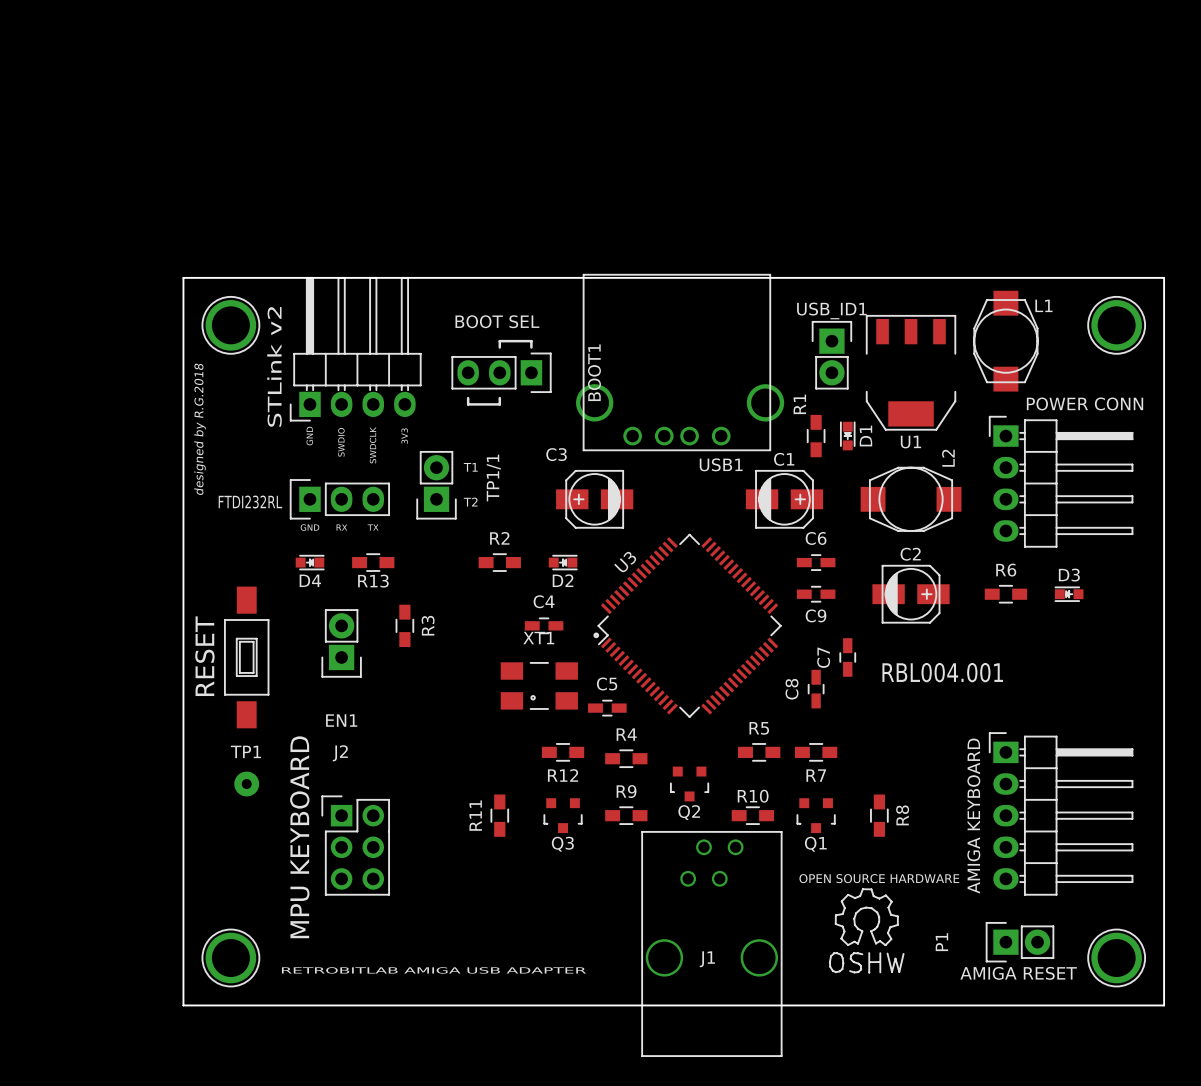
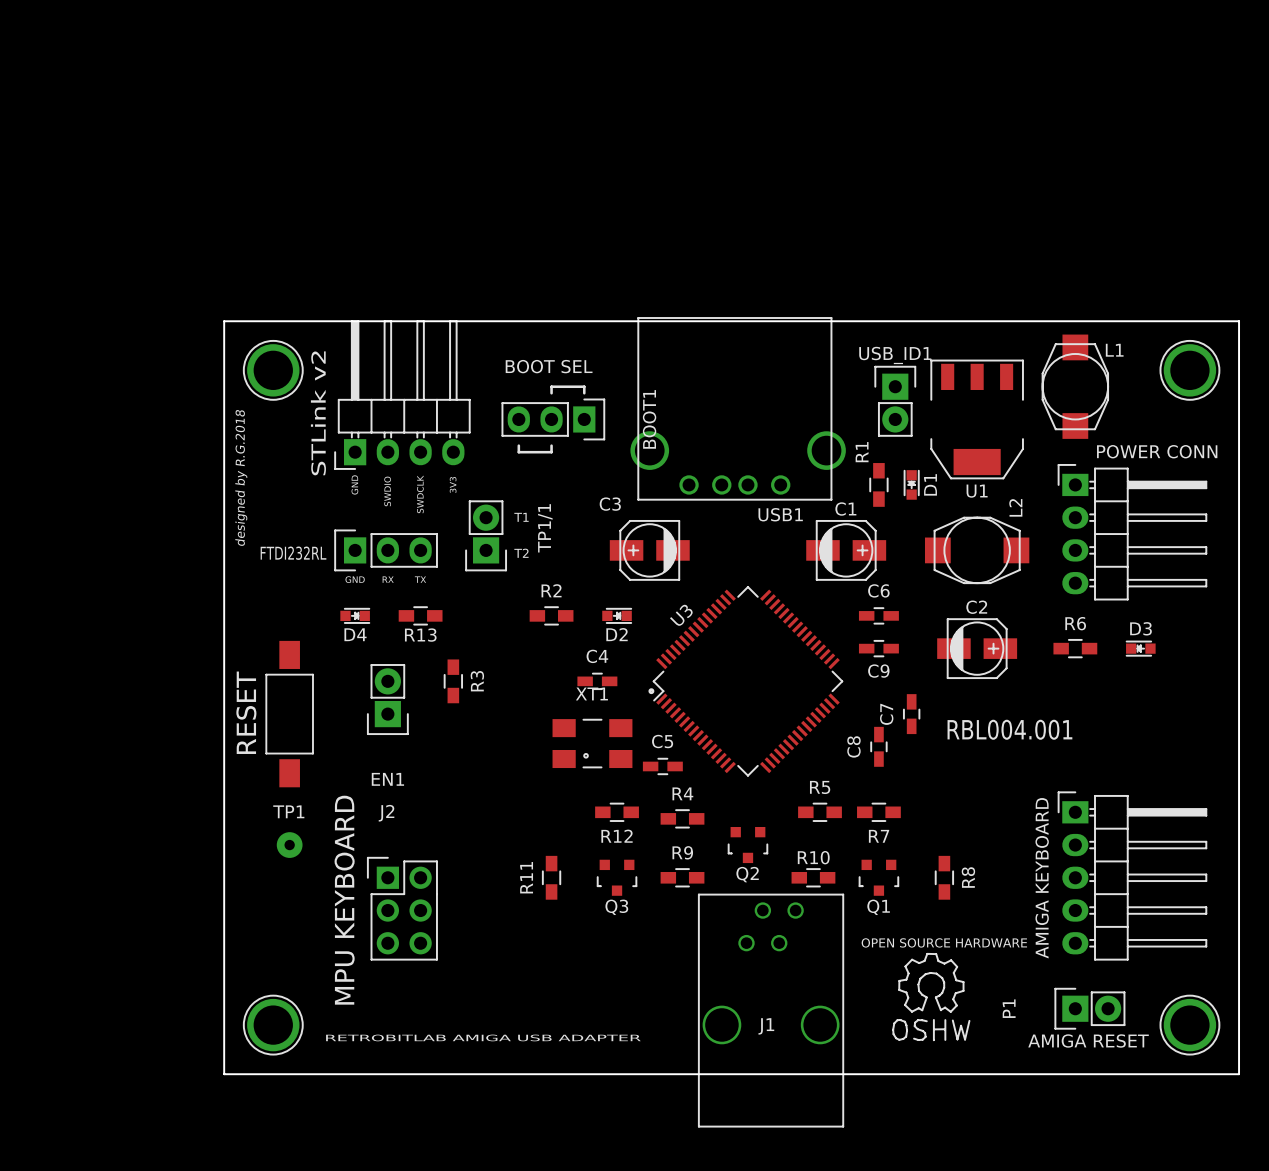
part footprint: [223, 586, 270, 729] -> [265, 640, 314, 788]

